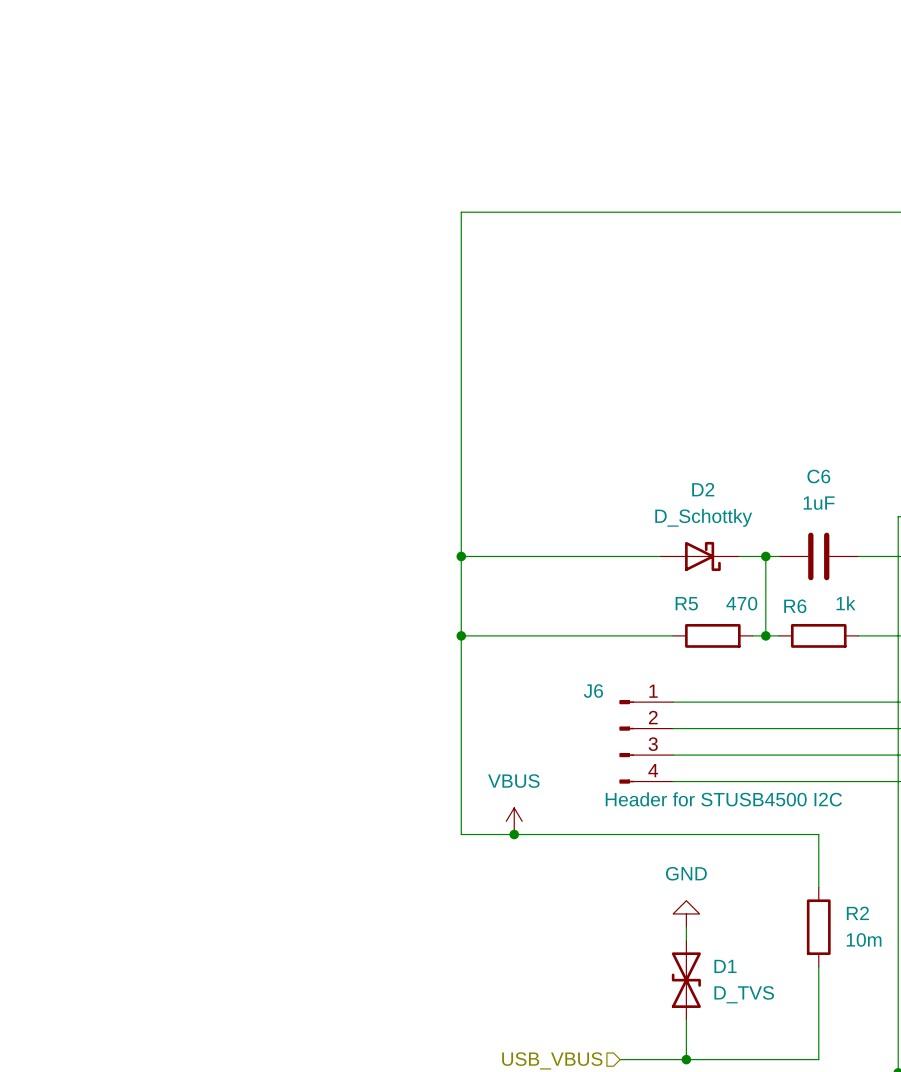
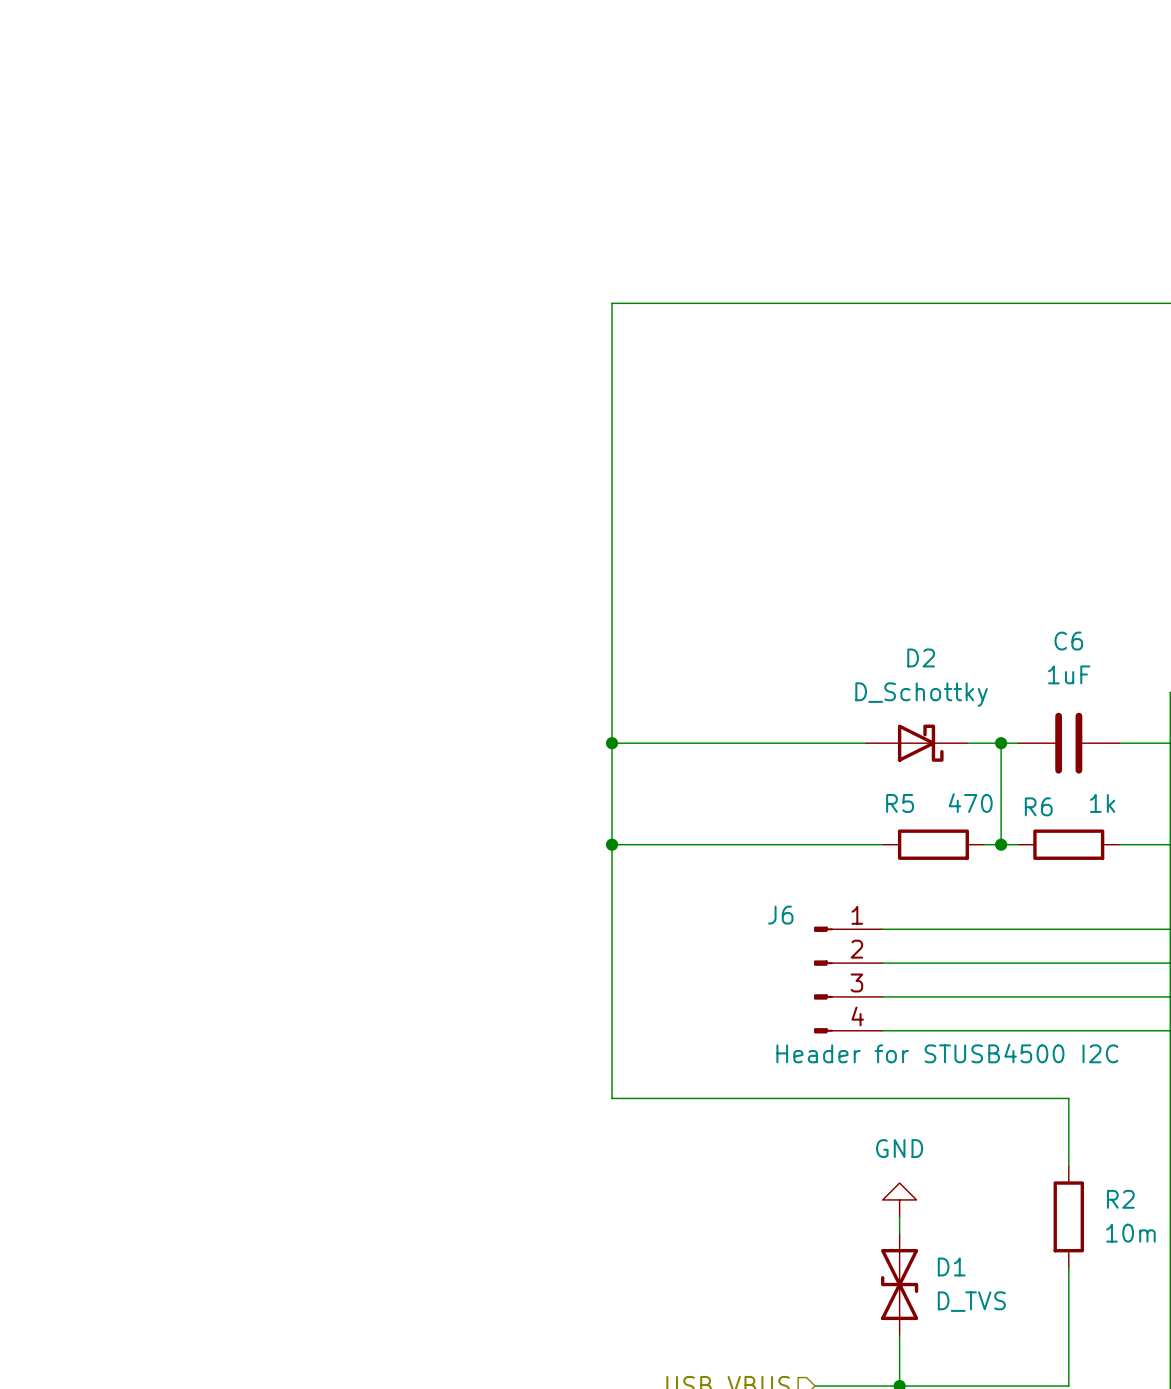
power symbol: VBUS (514, 821) -> none
junction: (514, 834) -> none

